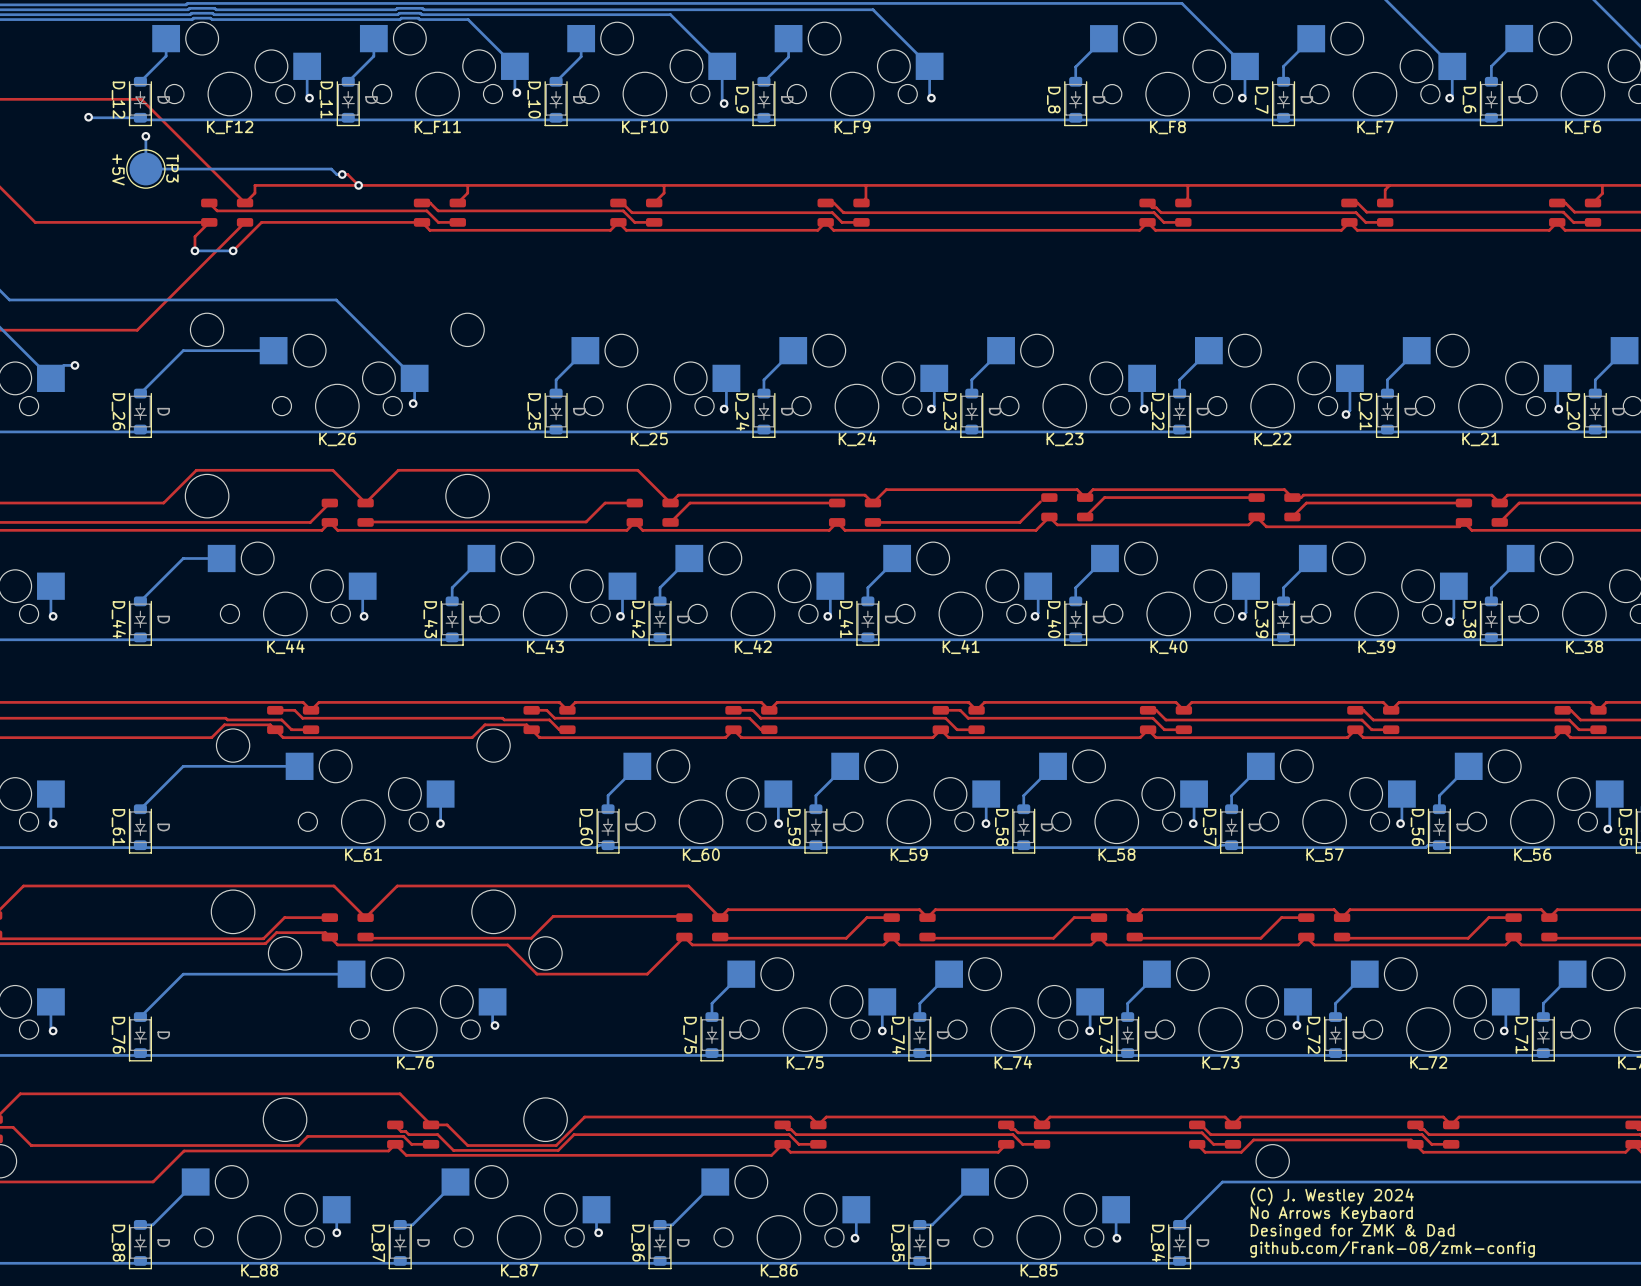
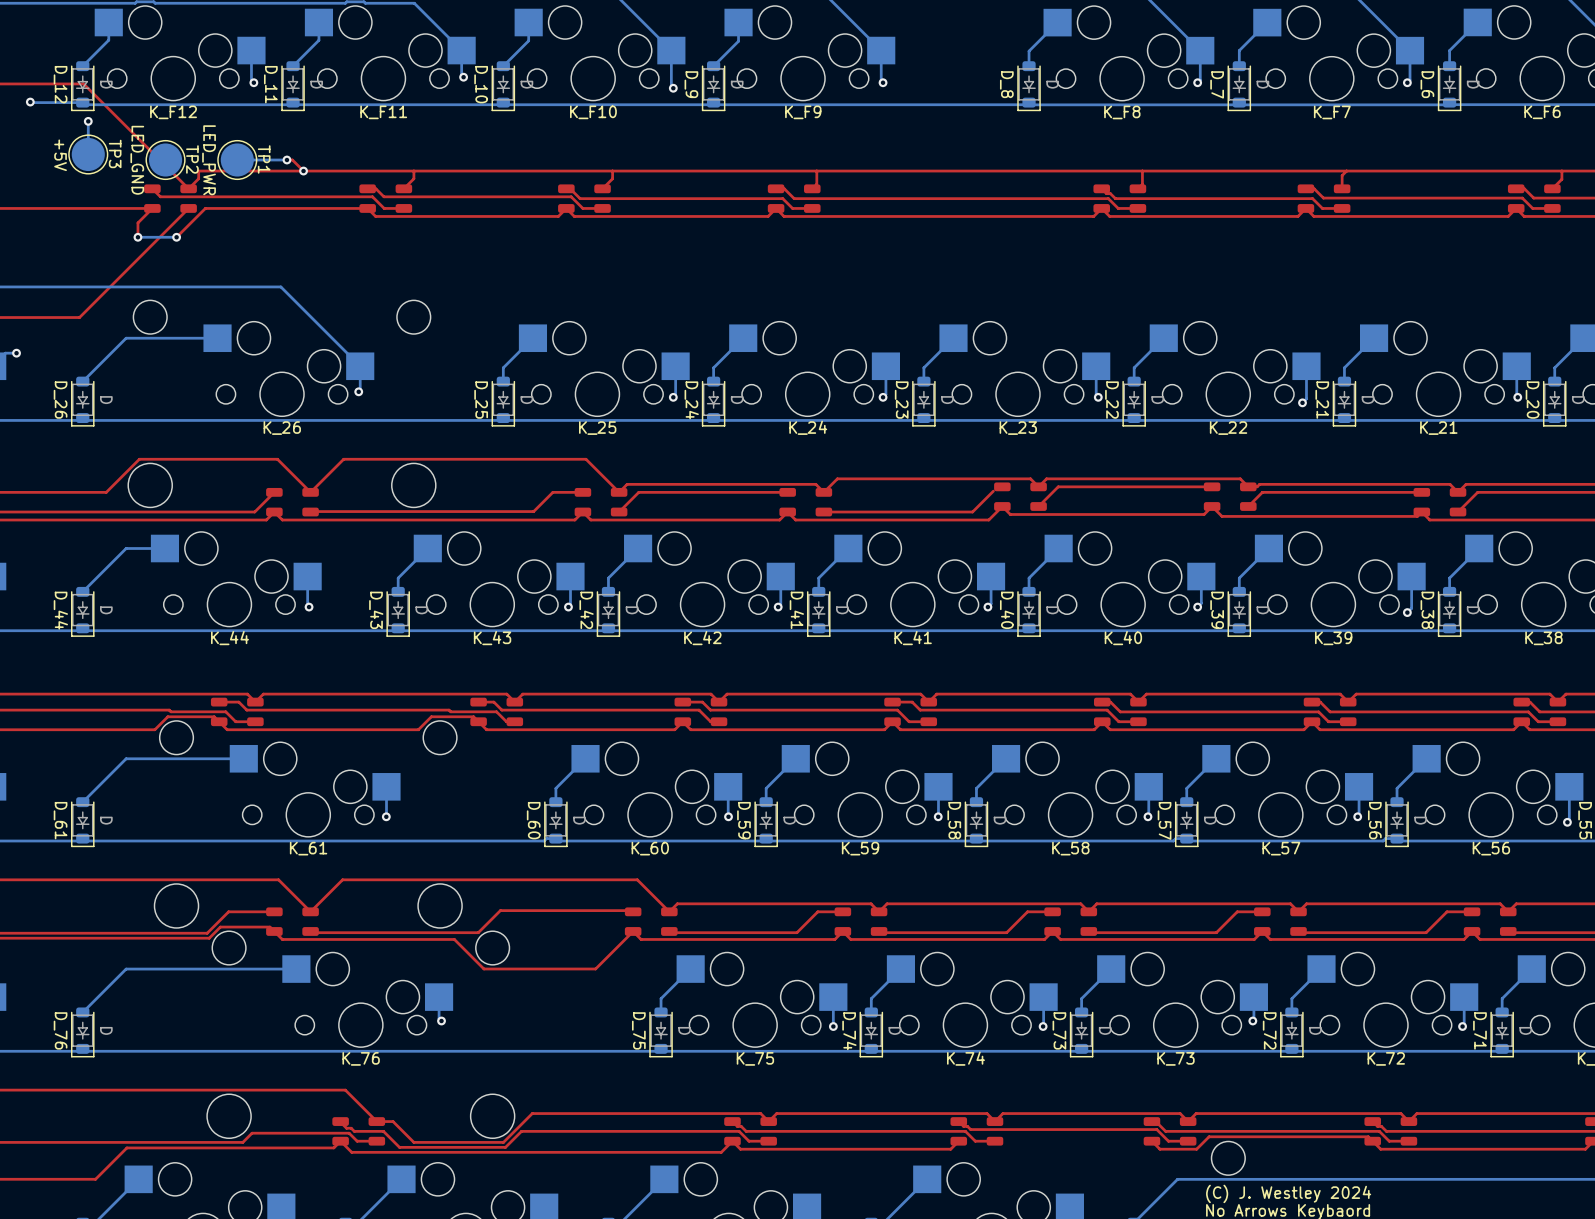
bottom track: (145, 169) (331, 169) (336, 174) -> (237, 160) (281, 160)
TP2: none -> LED_GND (165, 160)
TP1: none -> LED_PWR (237, 160)

